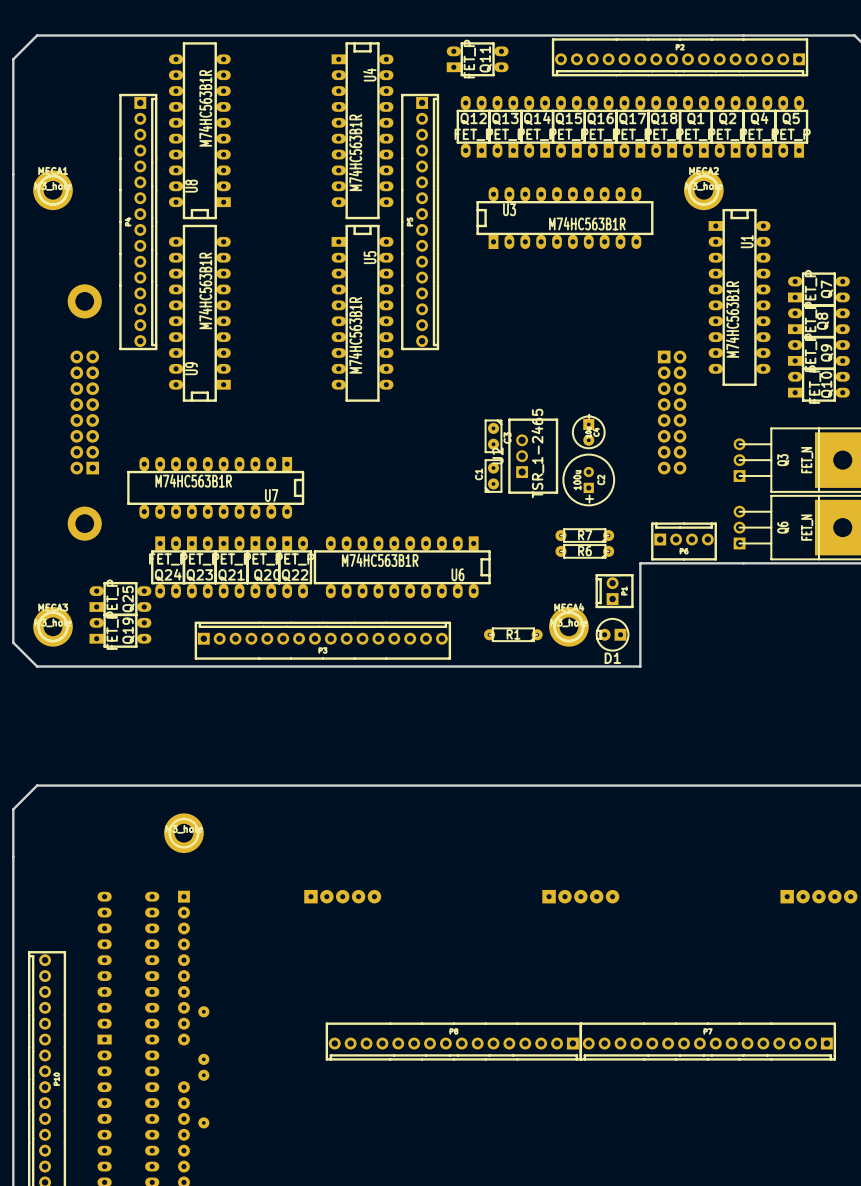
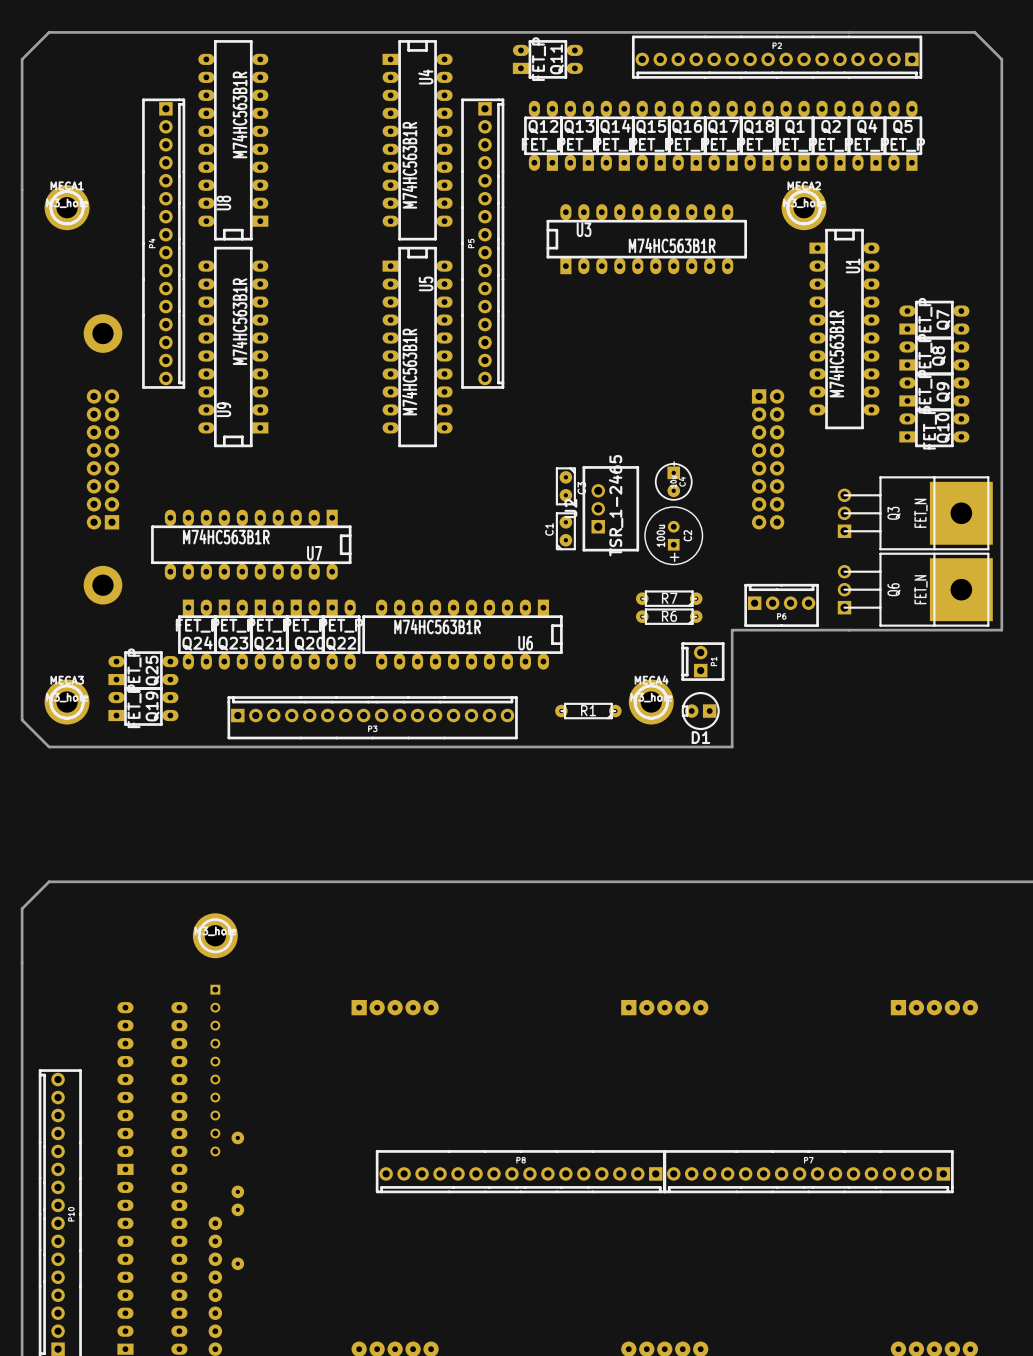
part: none -> (215, 1070)
part: (183, 968) -> none

